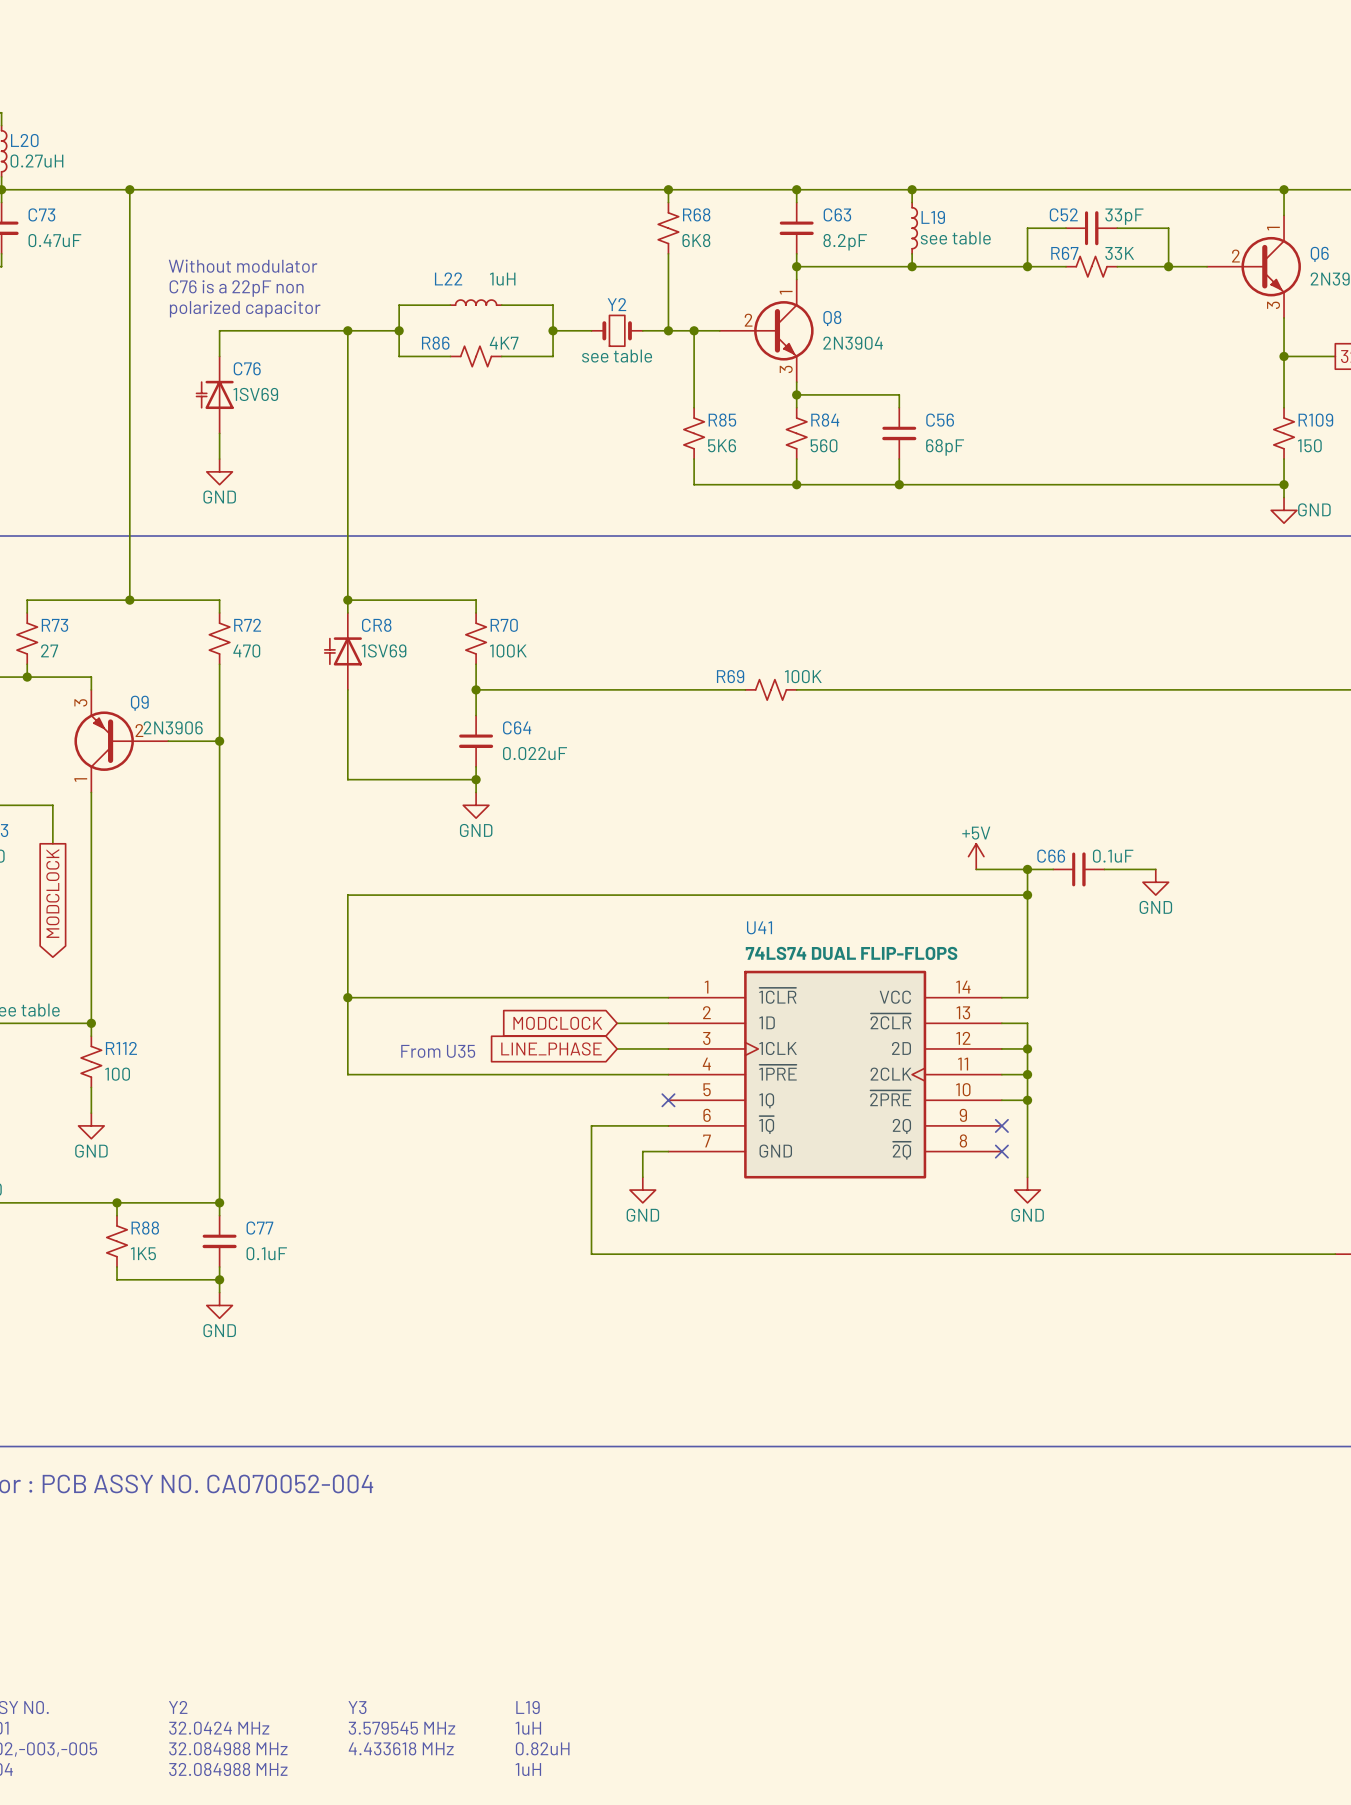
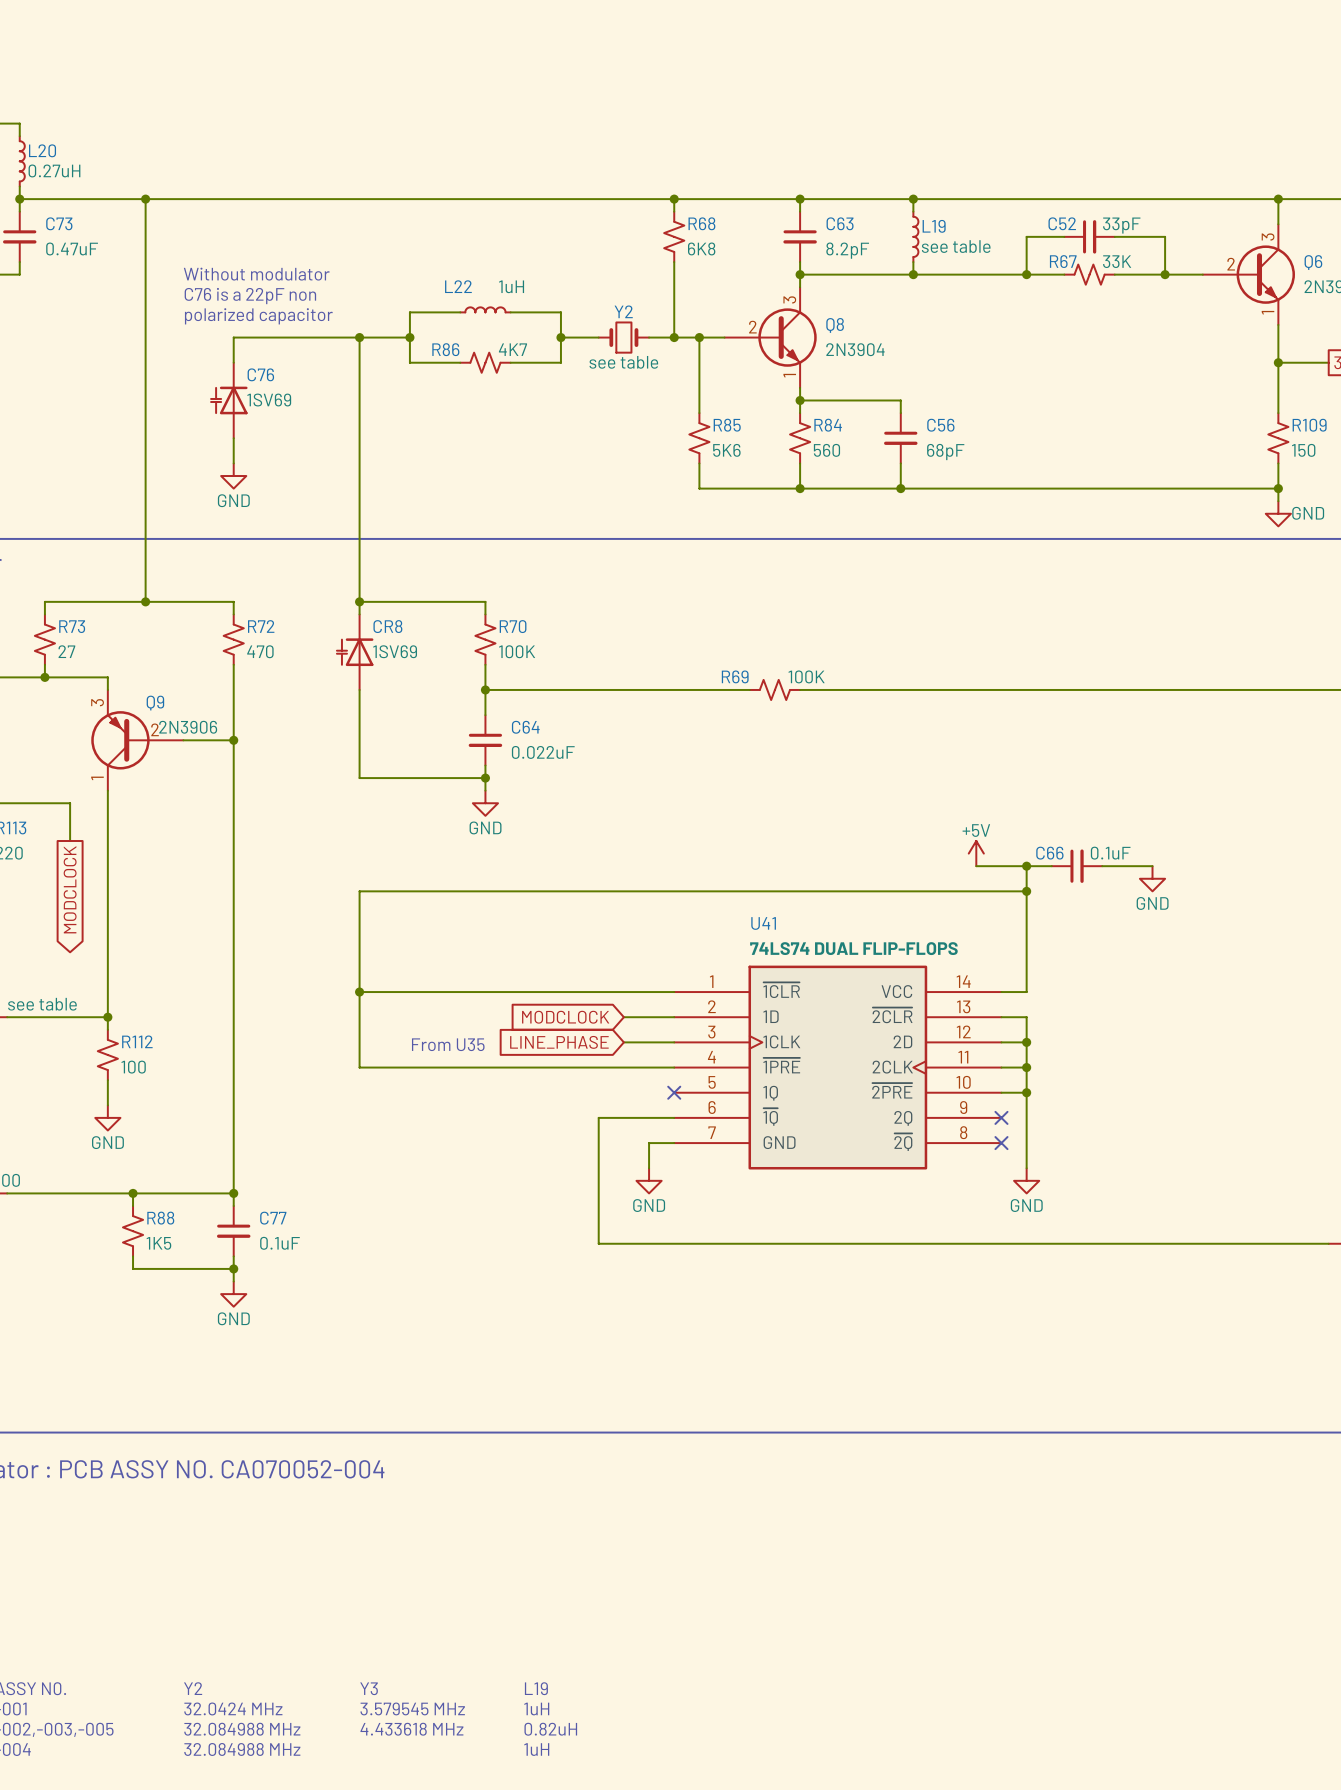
Q6 pin number: 1 (1273, 228) -> 3 (1268, 237)
Q8 pin number: 1 (786, 292) -> 3 (789, 299)
Q6 pin number: 3 (1273, 305) -> 1 (1267, 312)
Q8 pin number: 3 (786, 369) -> 1 (789, 375)

